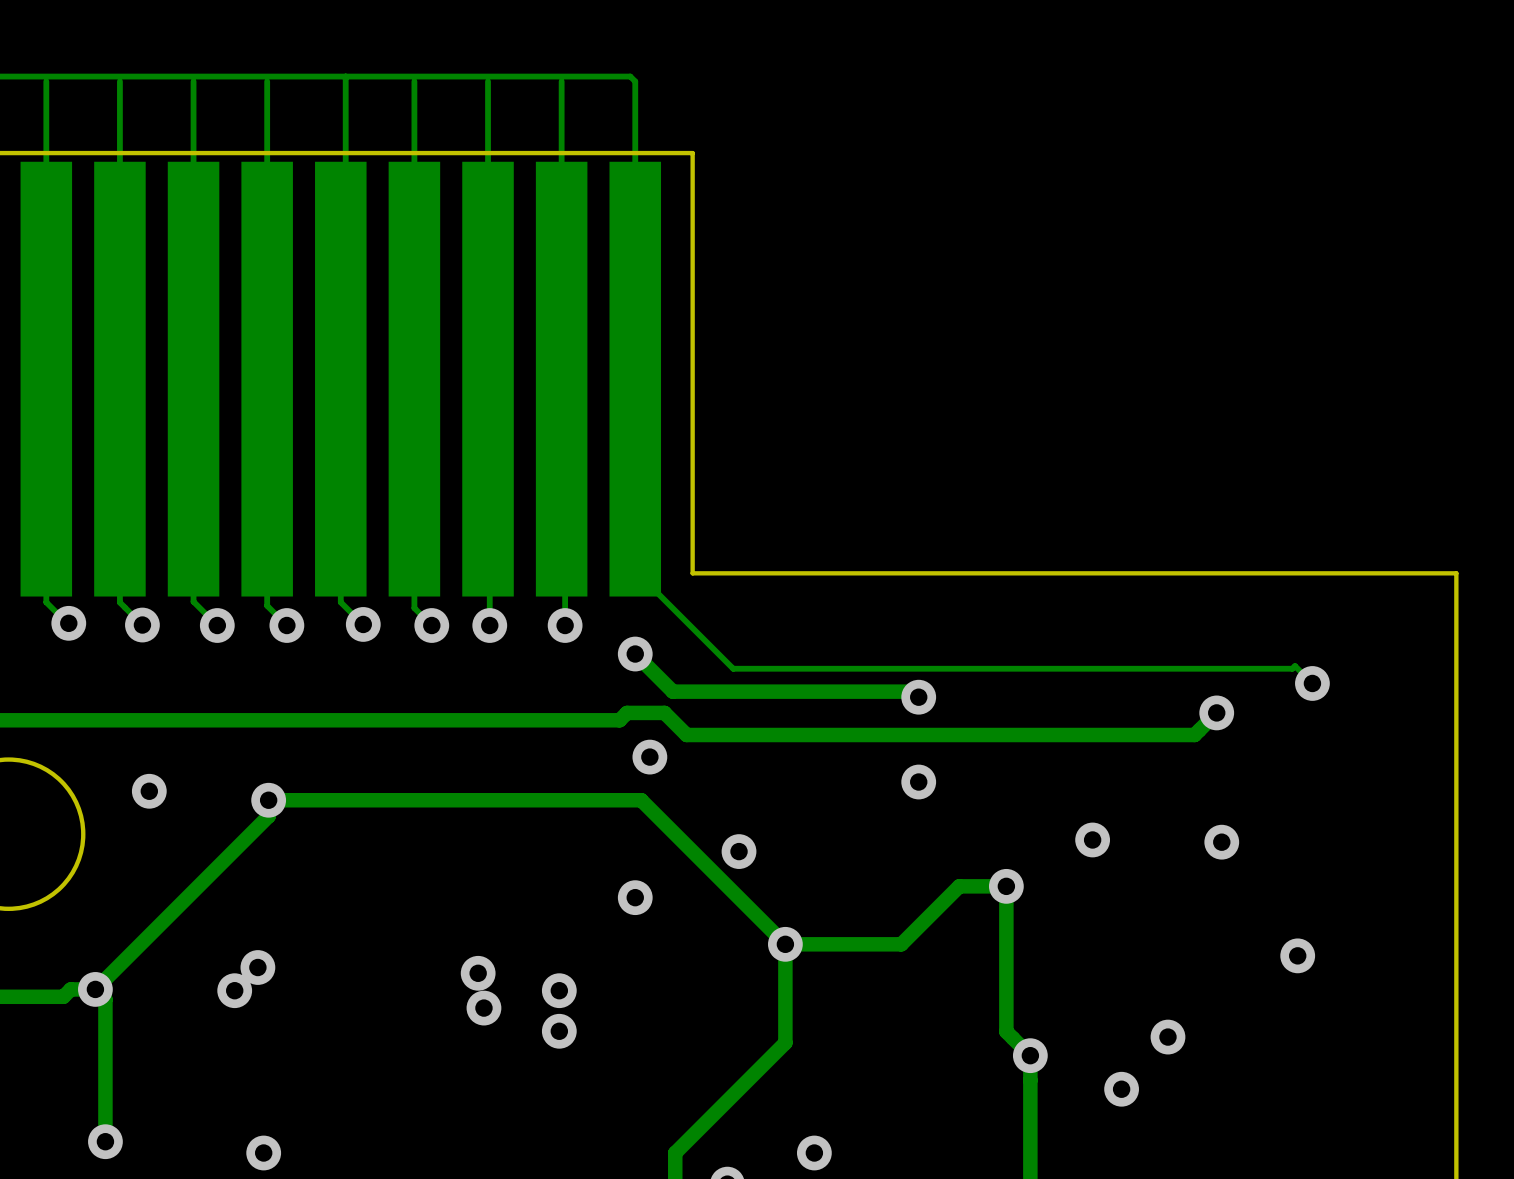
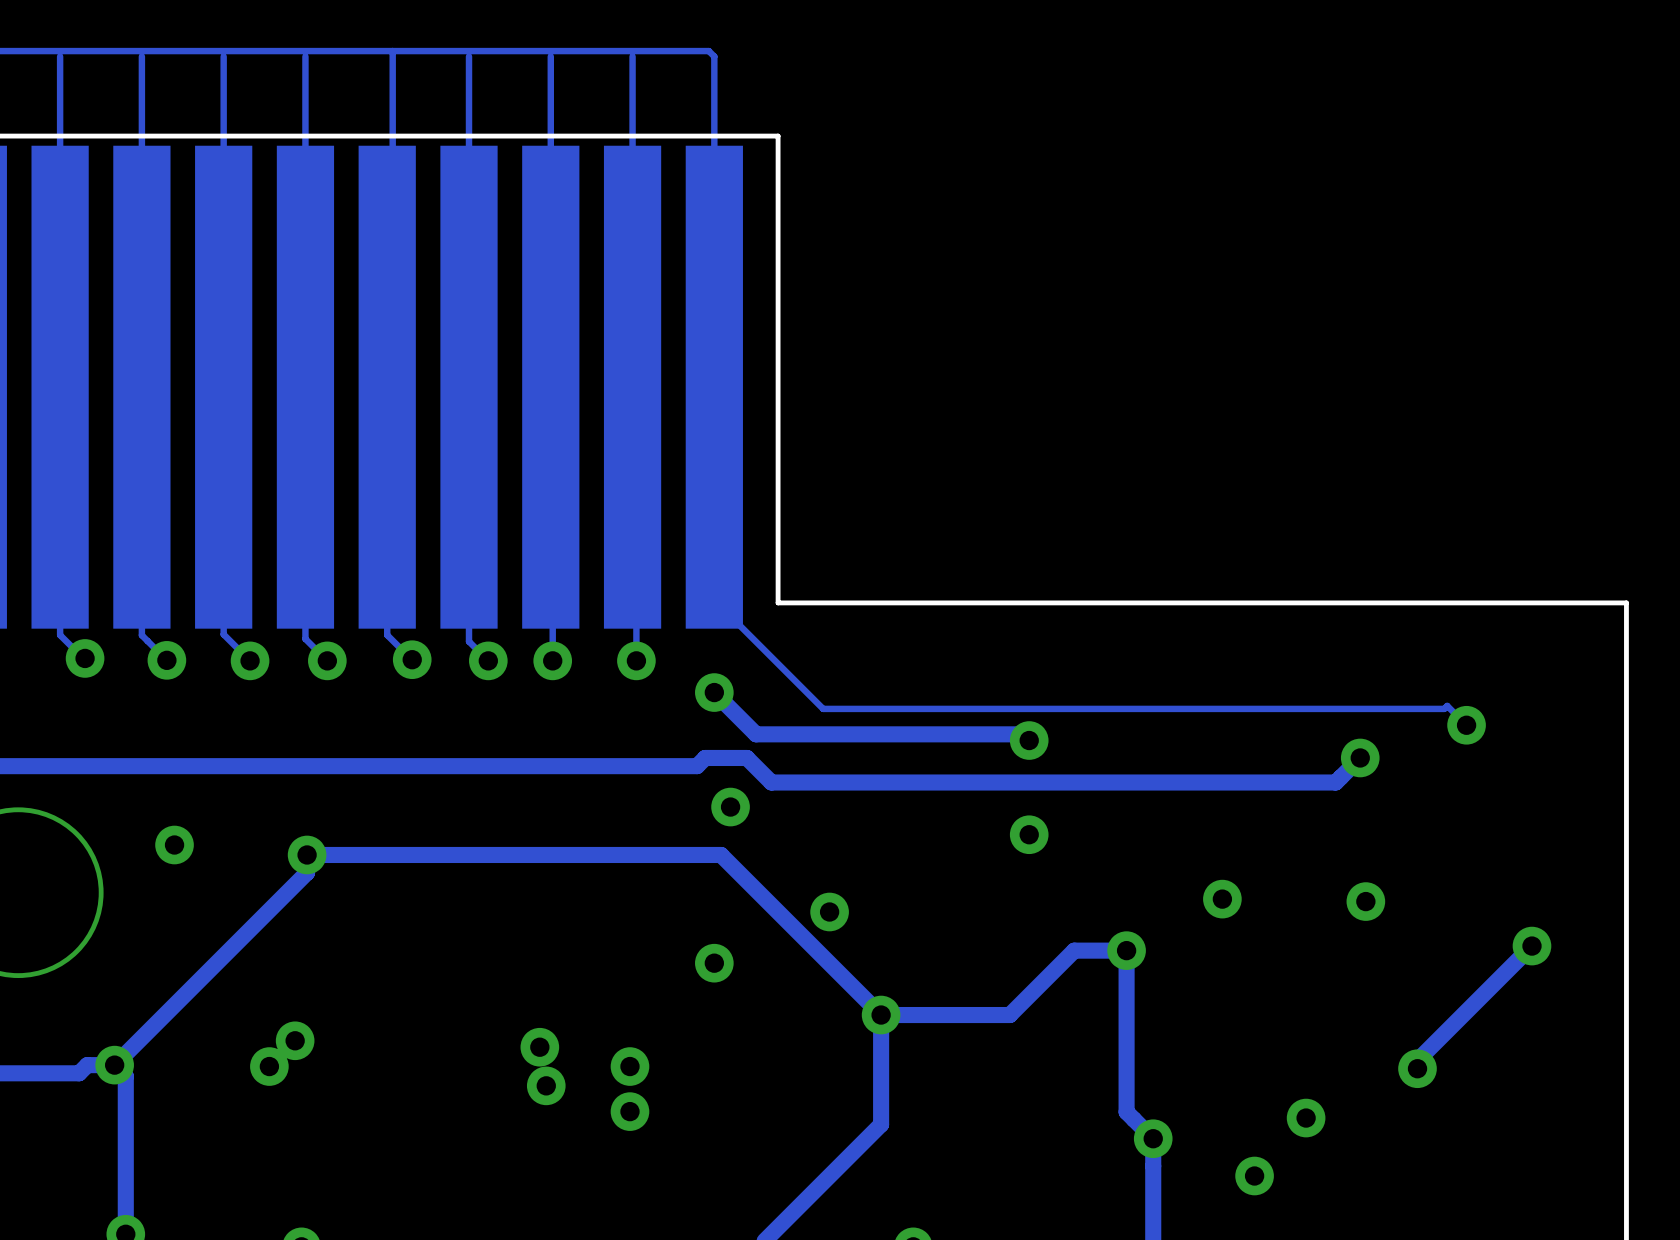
track: none -> (1531, 946) (1417, 1060) (1417, 1068)
via: none -> (1531, 946)
via position: (1297, 955) -> (1417, 1068)

